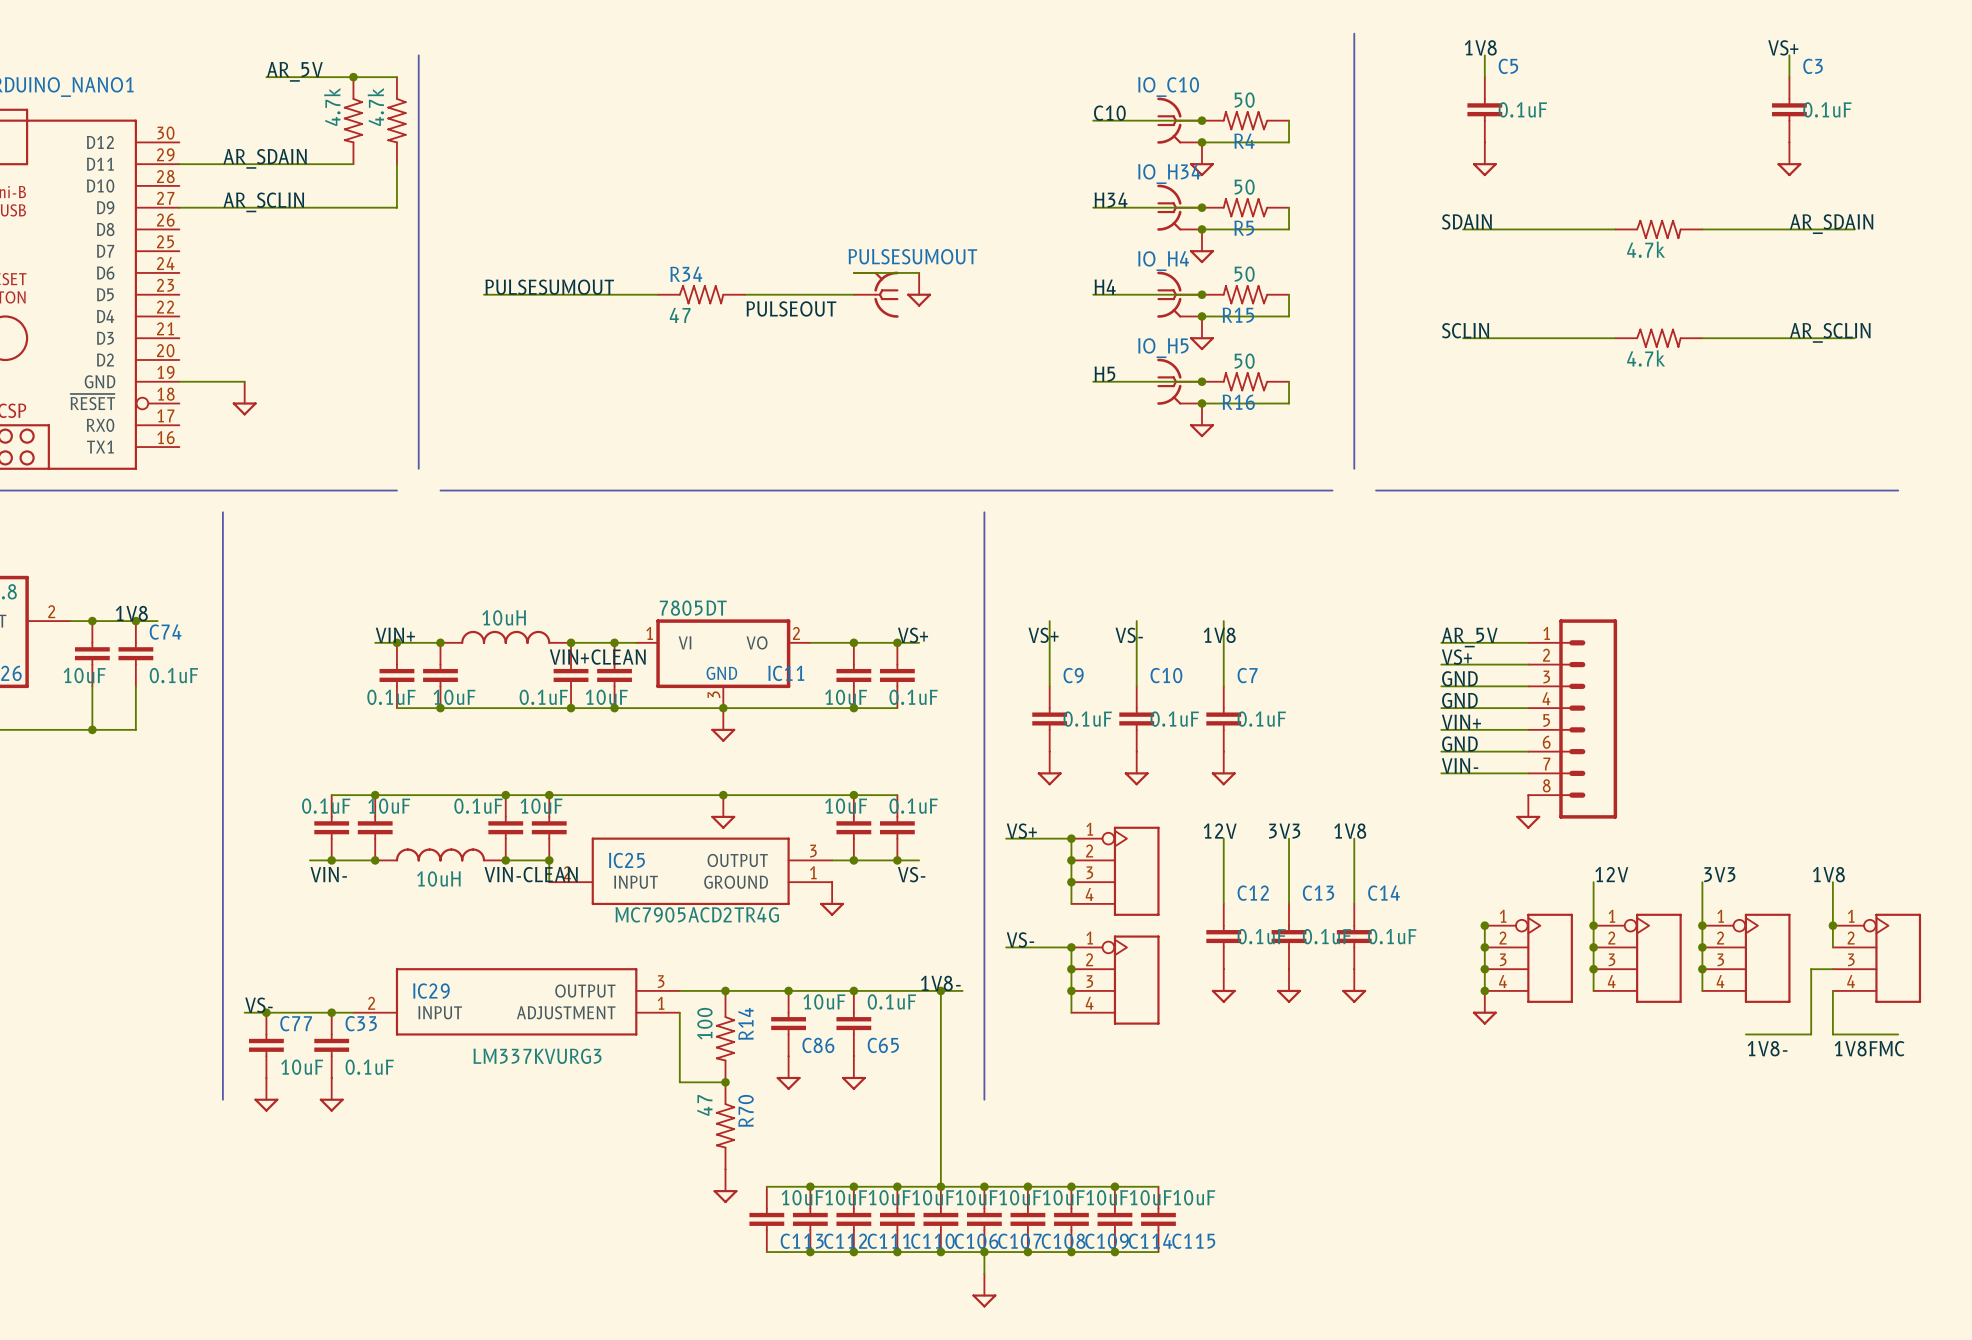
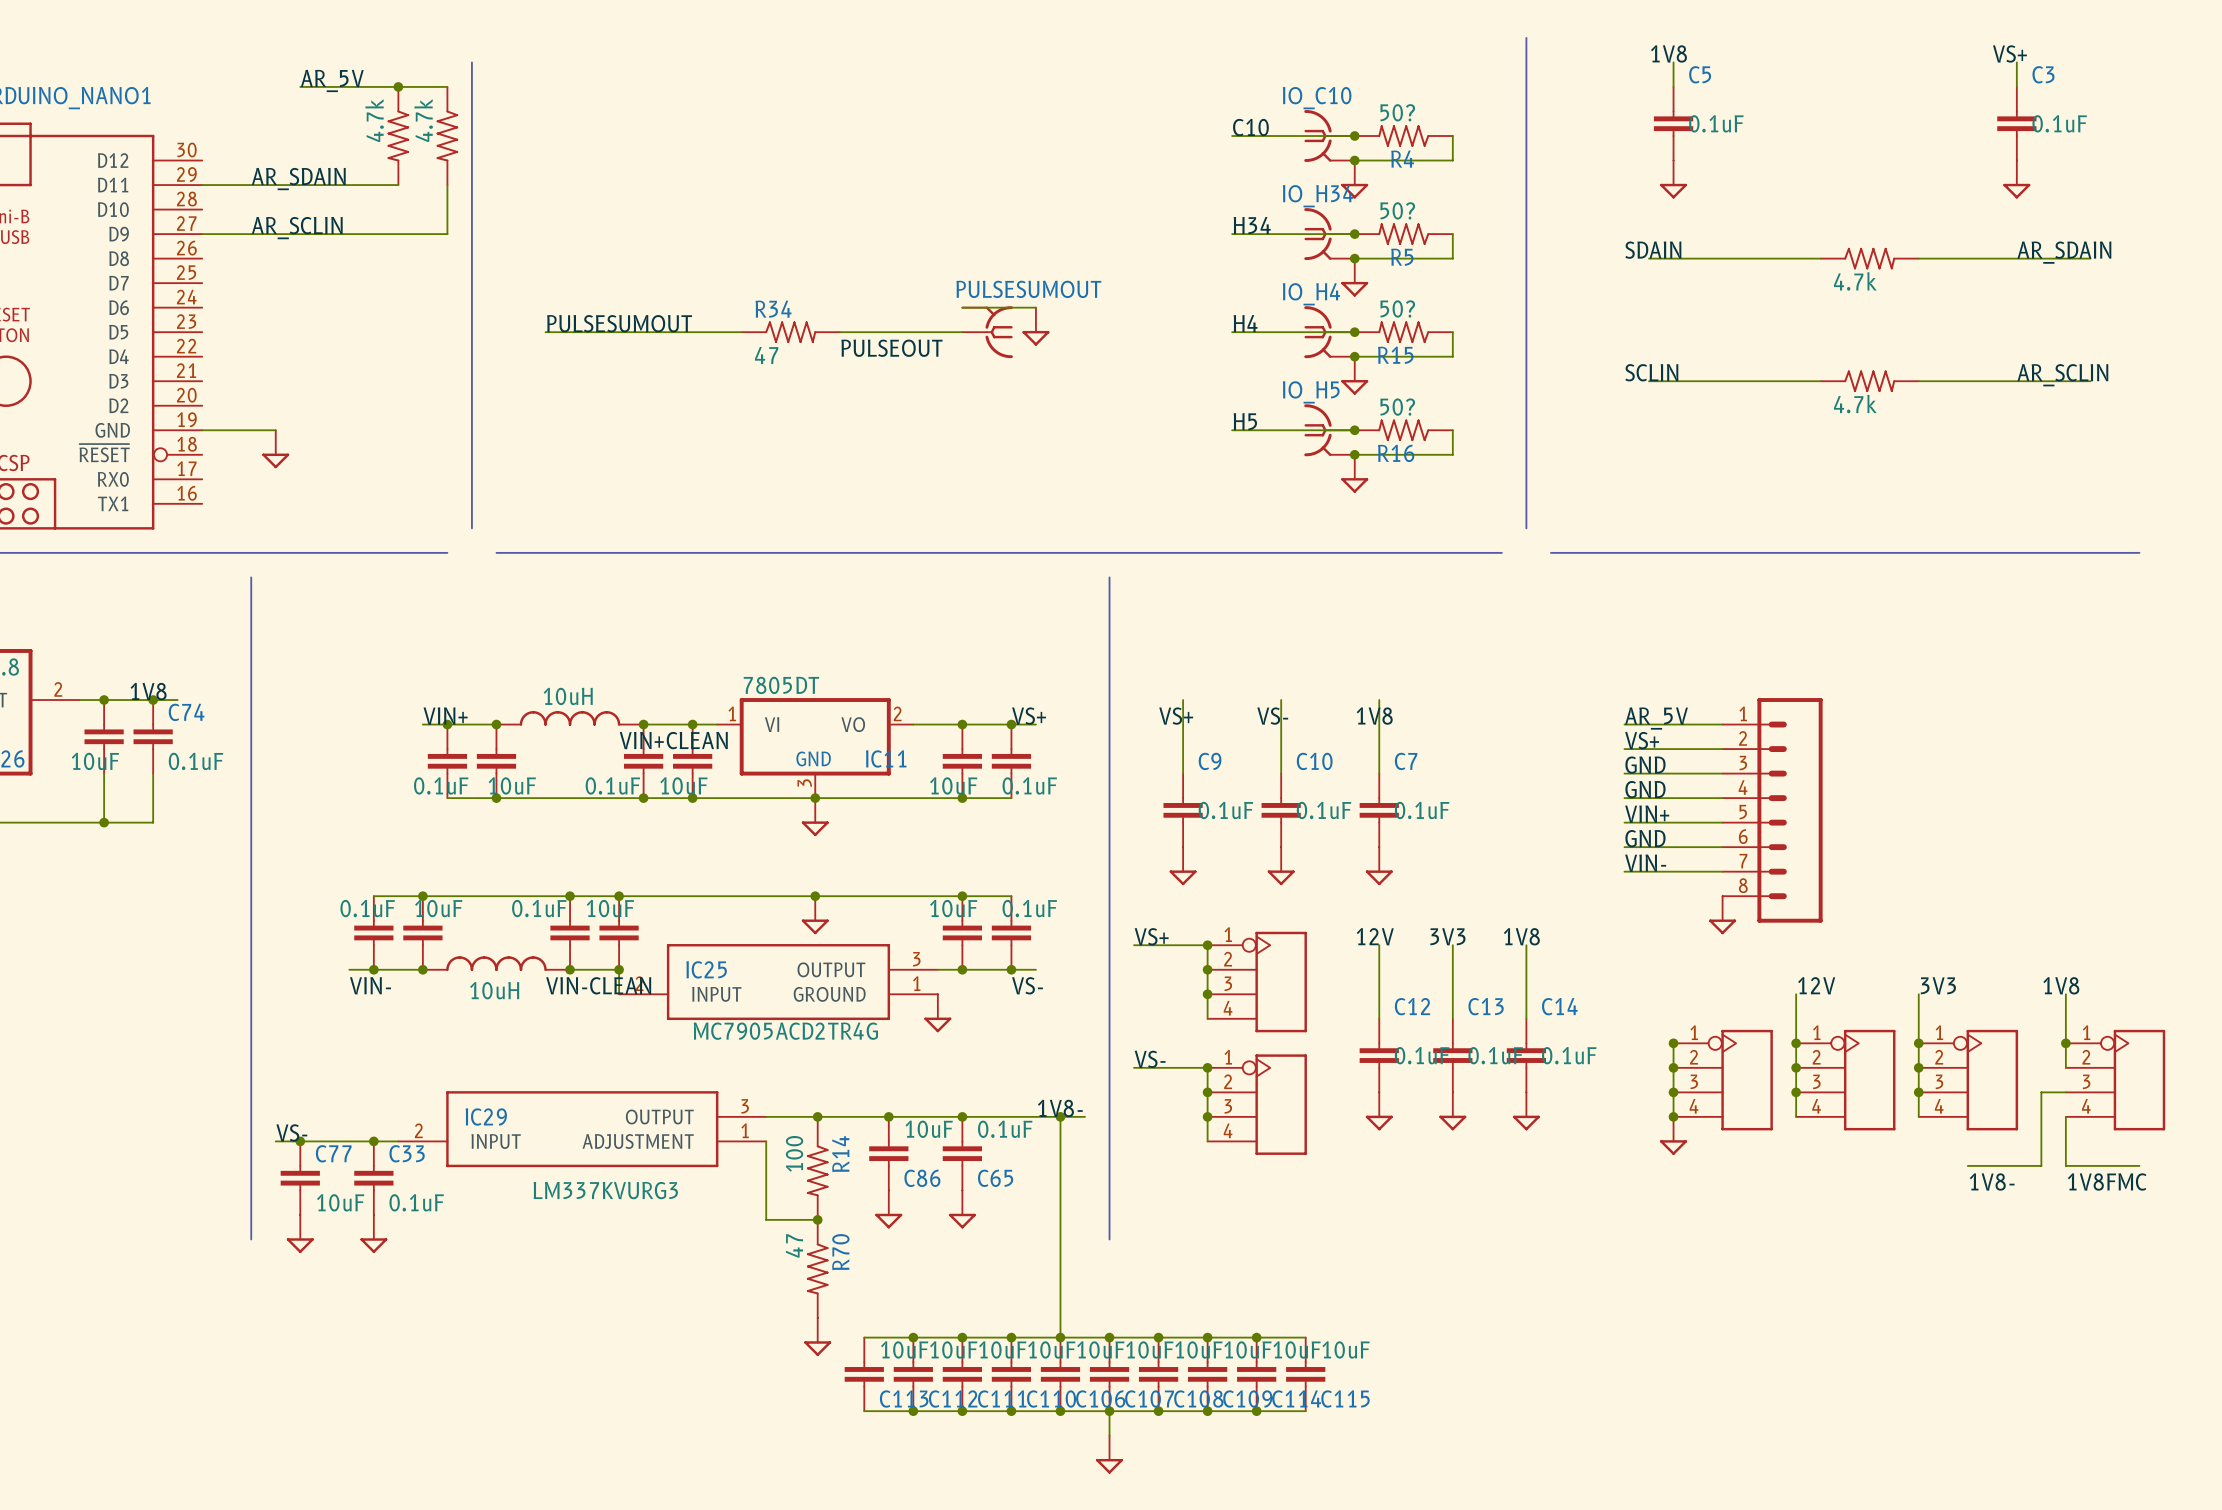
R4 value: 50 (1244, 100) -> 50? (1397, 112)
R5 value: 50 (1244, 187) -> 50? (1397, 210)
R15 value: 50 (1244, 274) -> 50? (1397, 309)
R16 value: 50 (1244, 361) -> 50? (1397, 407)

